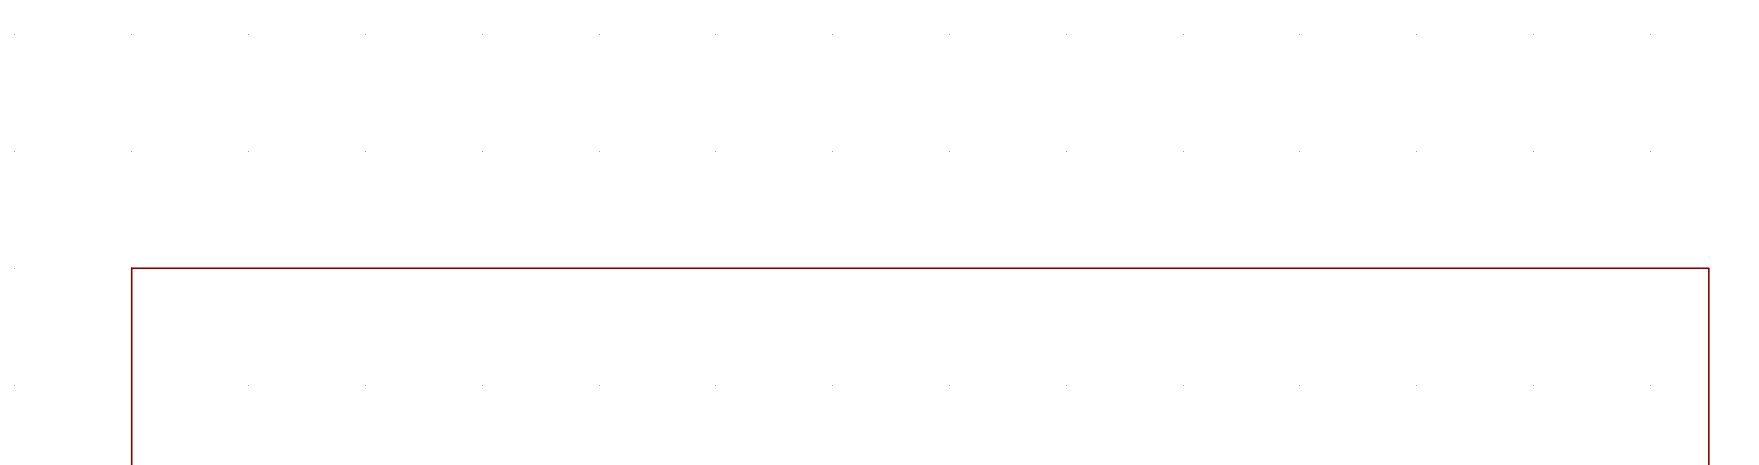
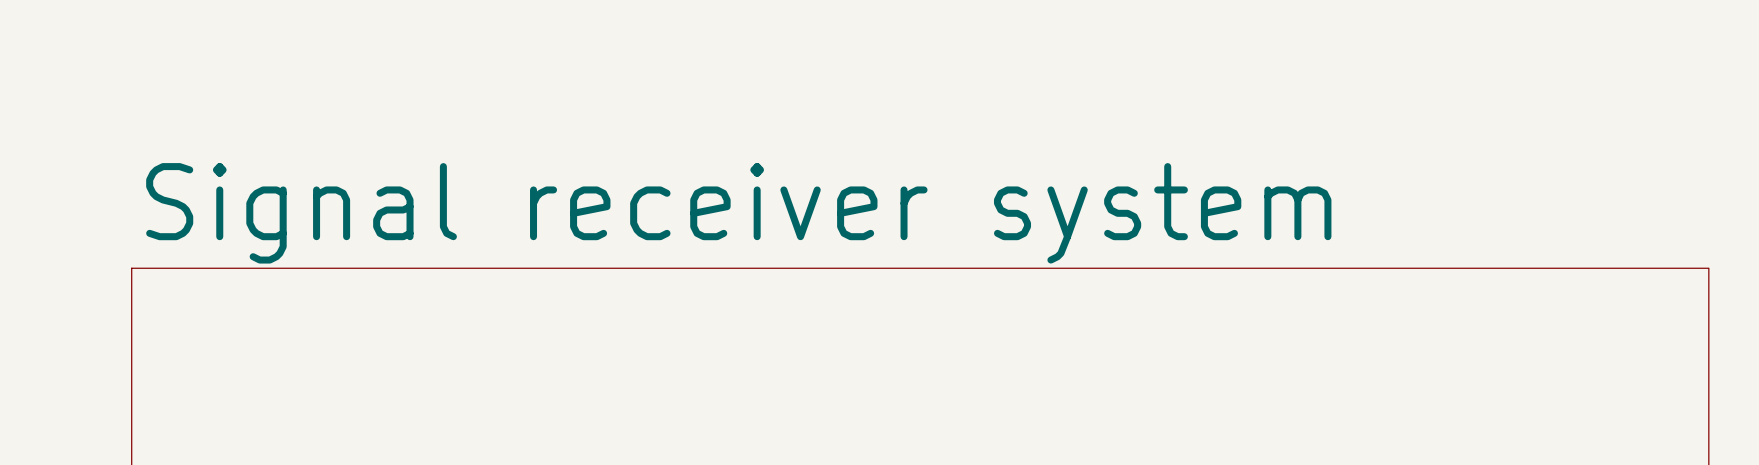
sheet Signal receiver system name: none -> Signal receiver system (738, 213)

